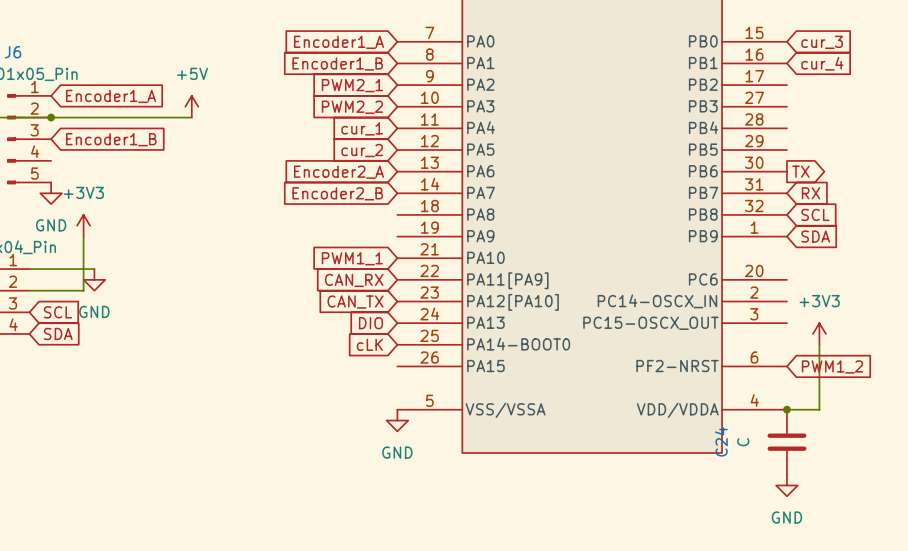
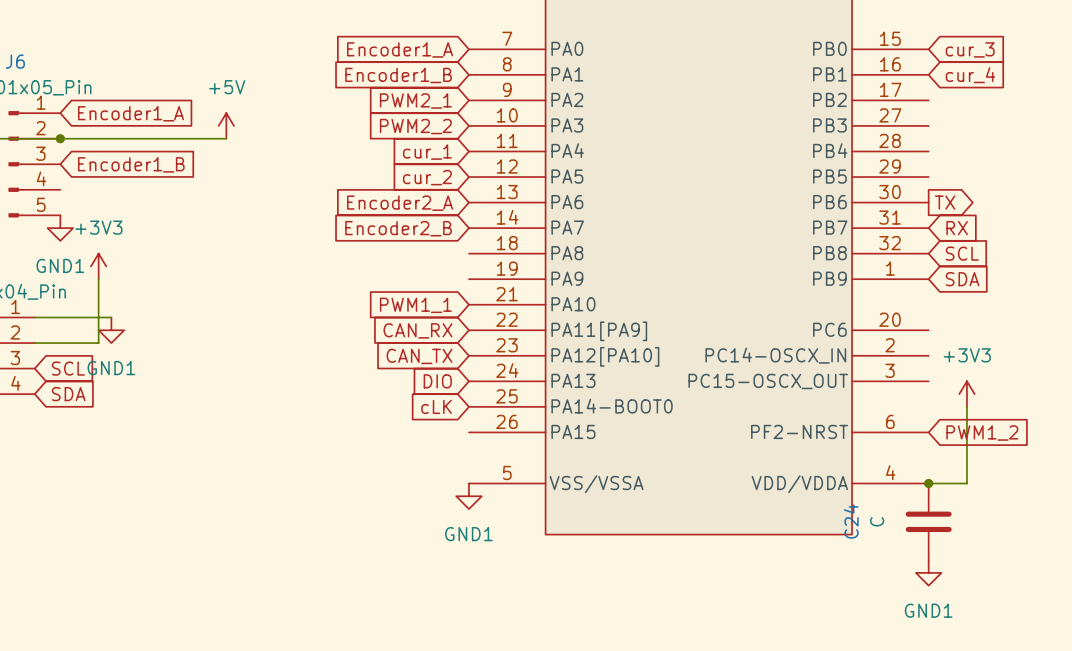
power symbol: GND (51, 193) -> GND1 (60, 228)
power symbol: GND (94, 279) -> GND1 (111, 330)
power symbol: GND (397, 420) -> GND1 (468, 496)
power symbol: GND (786, 485) -> GND1 (928, 572)

